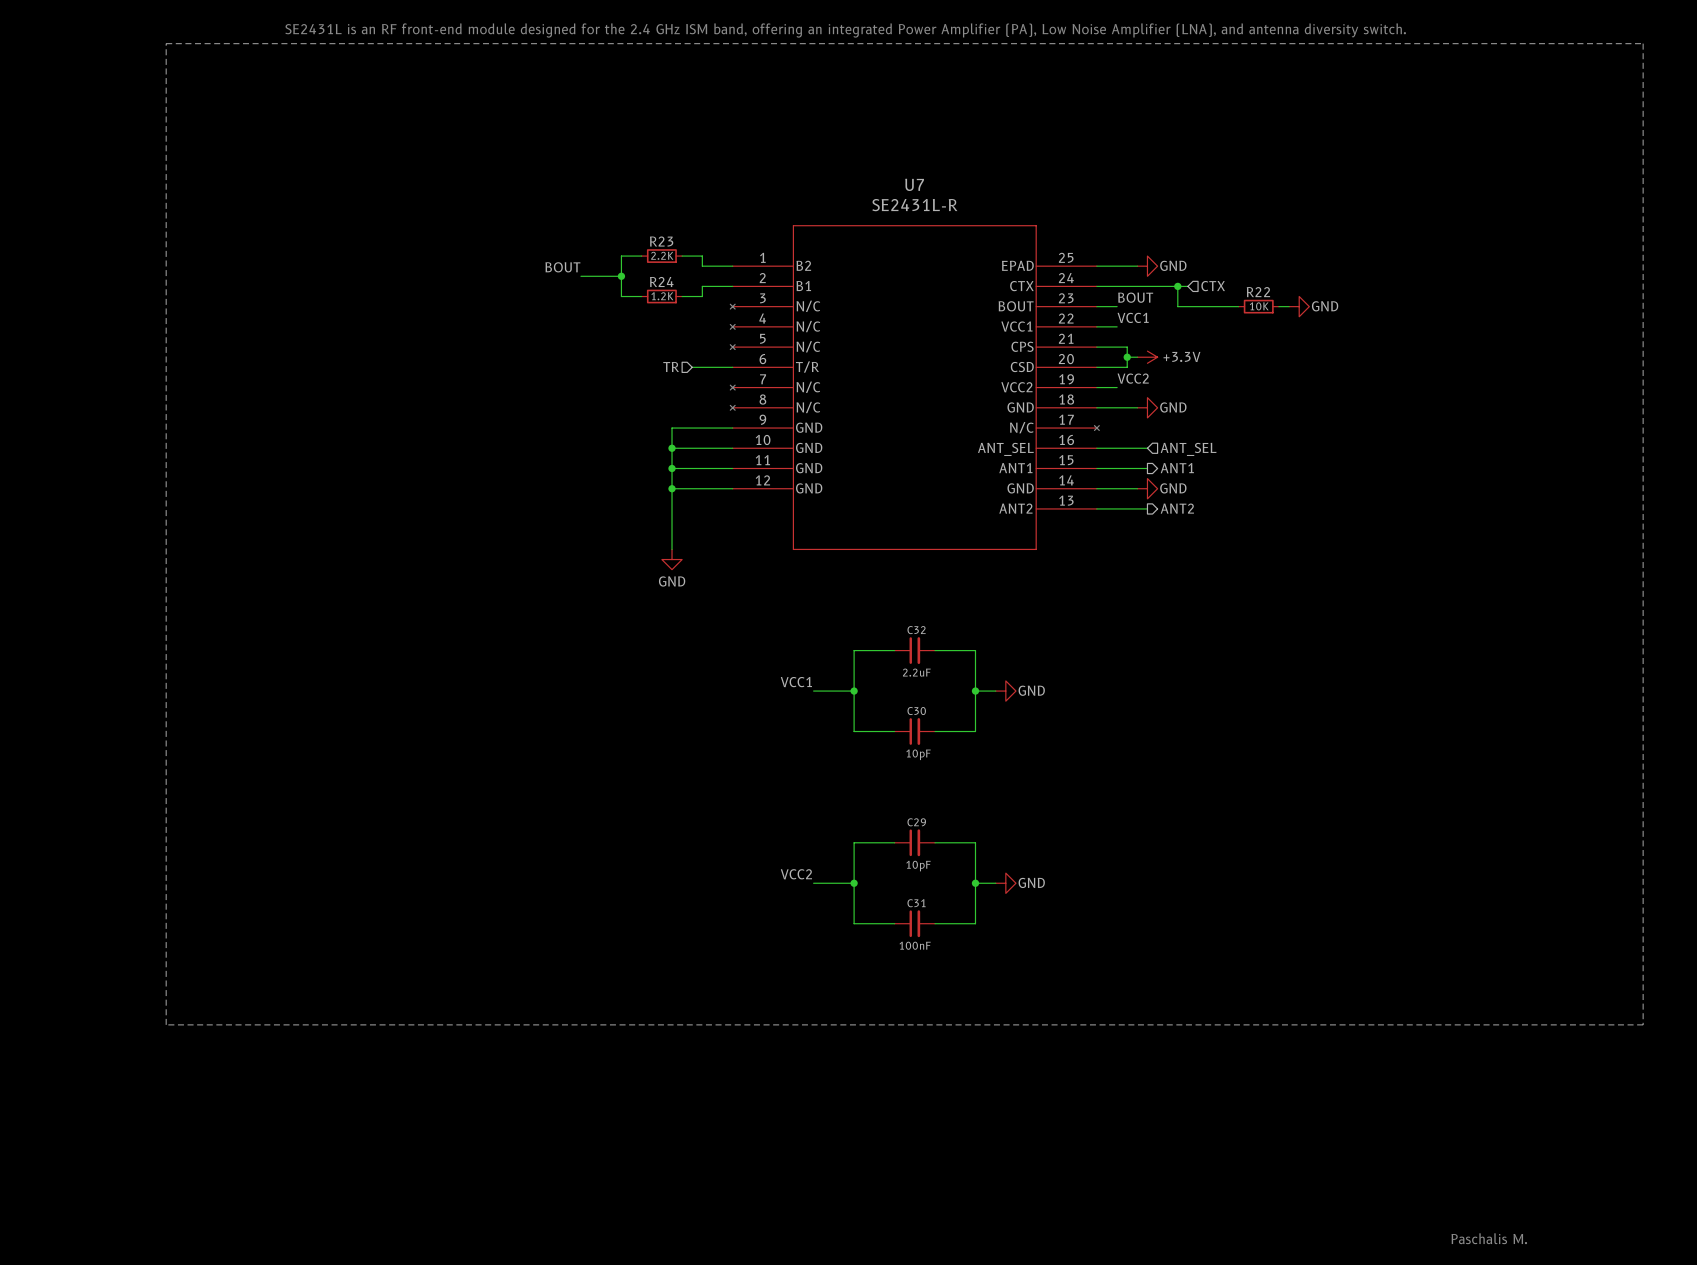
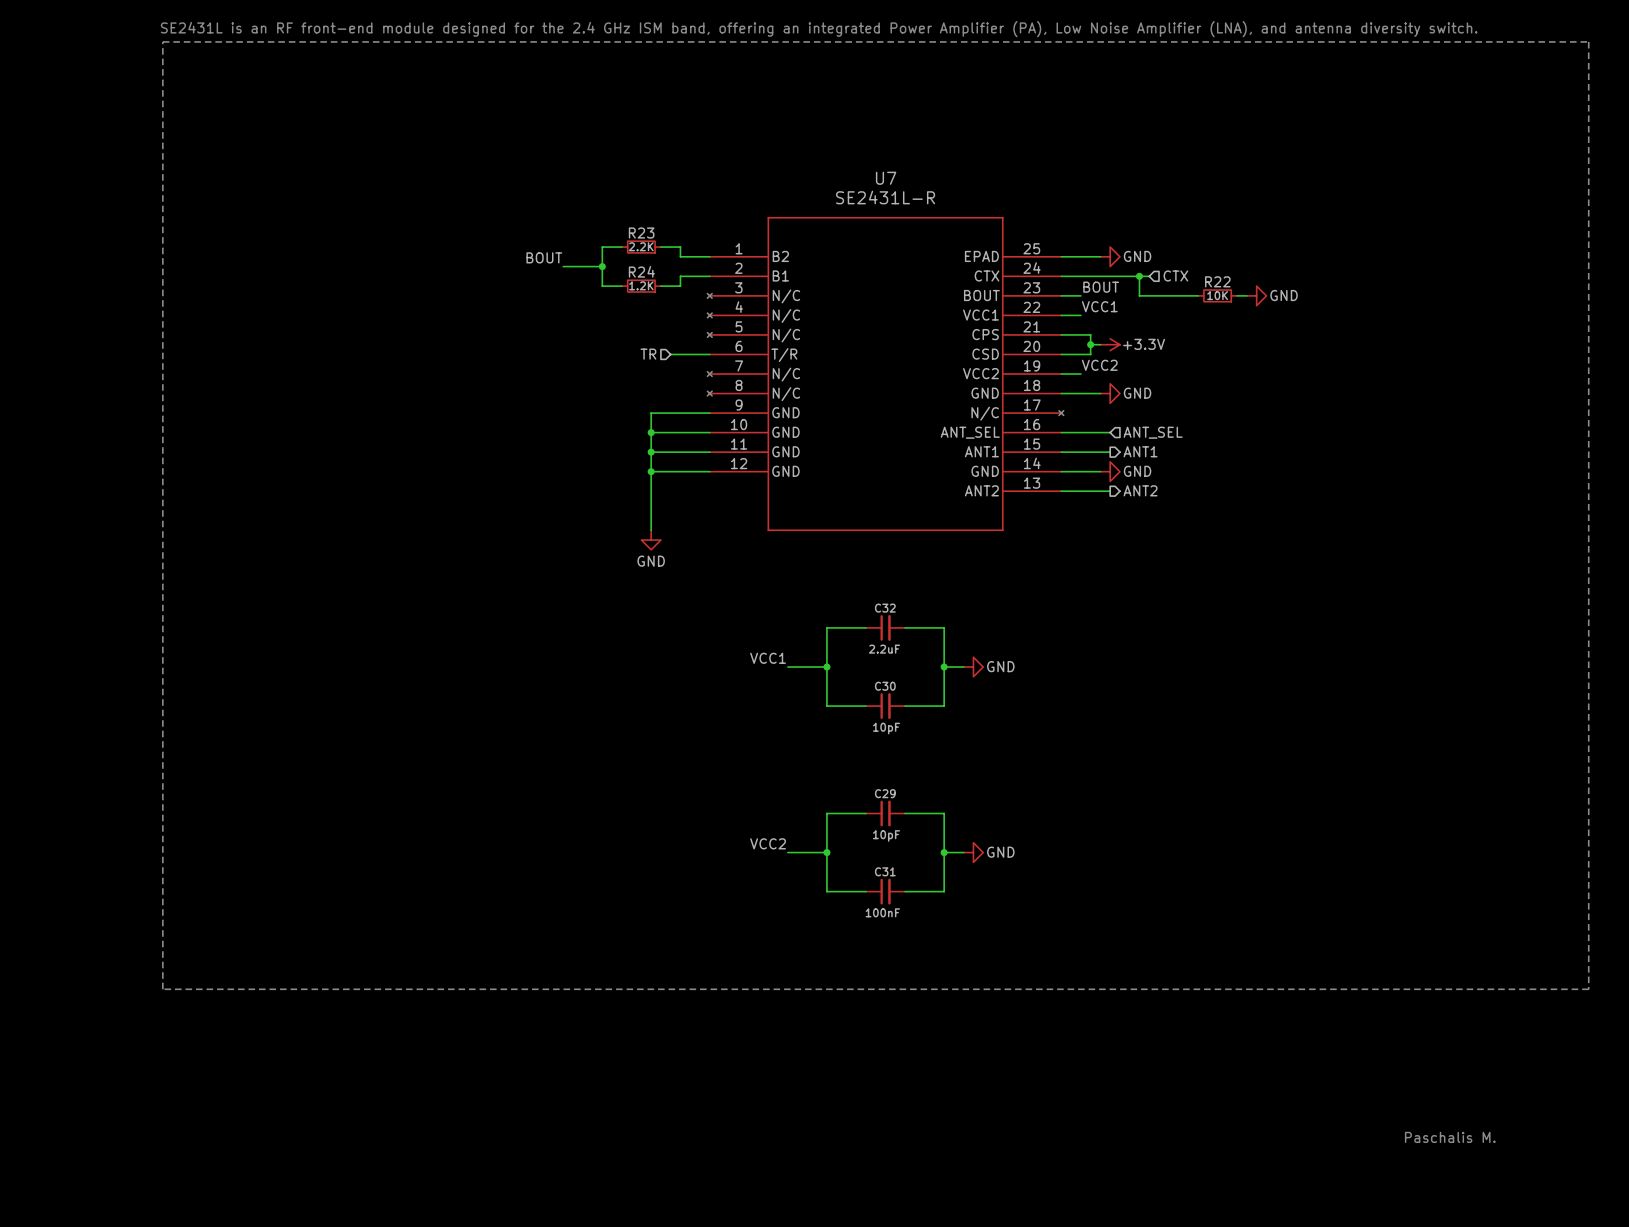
text position: Paschalis M. (1489, 1238) -> Paschalis M. (1450, 1137)

